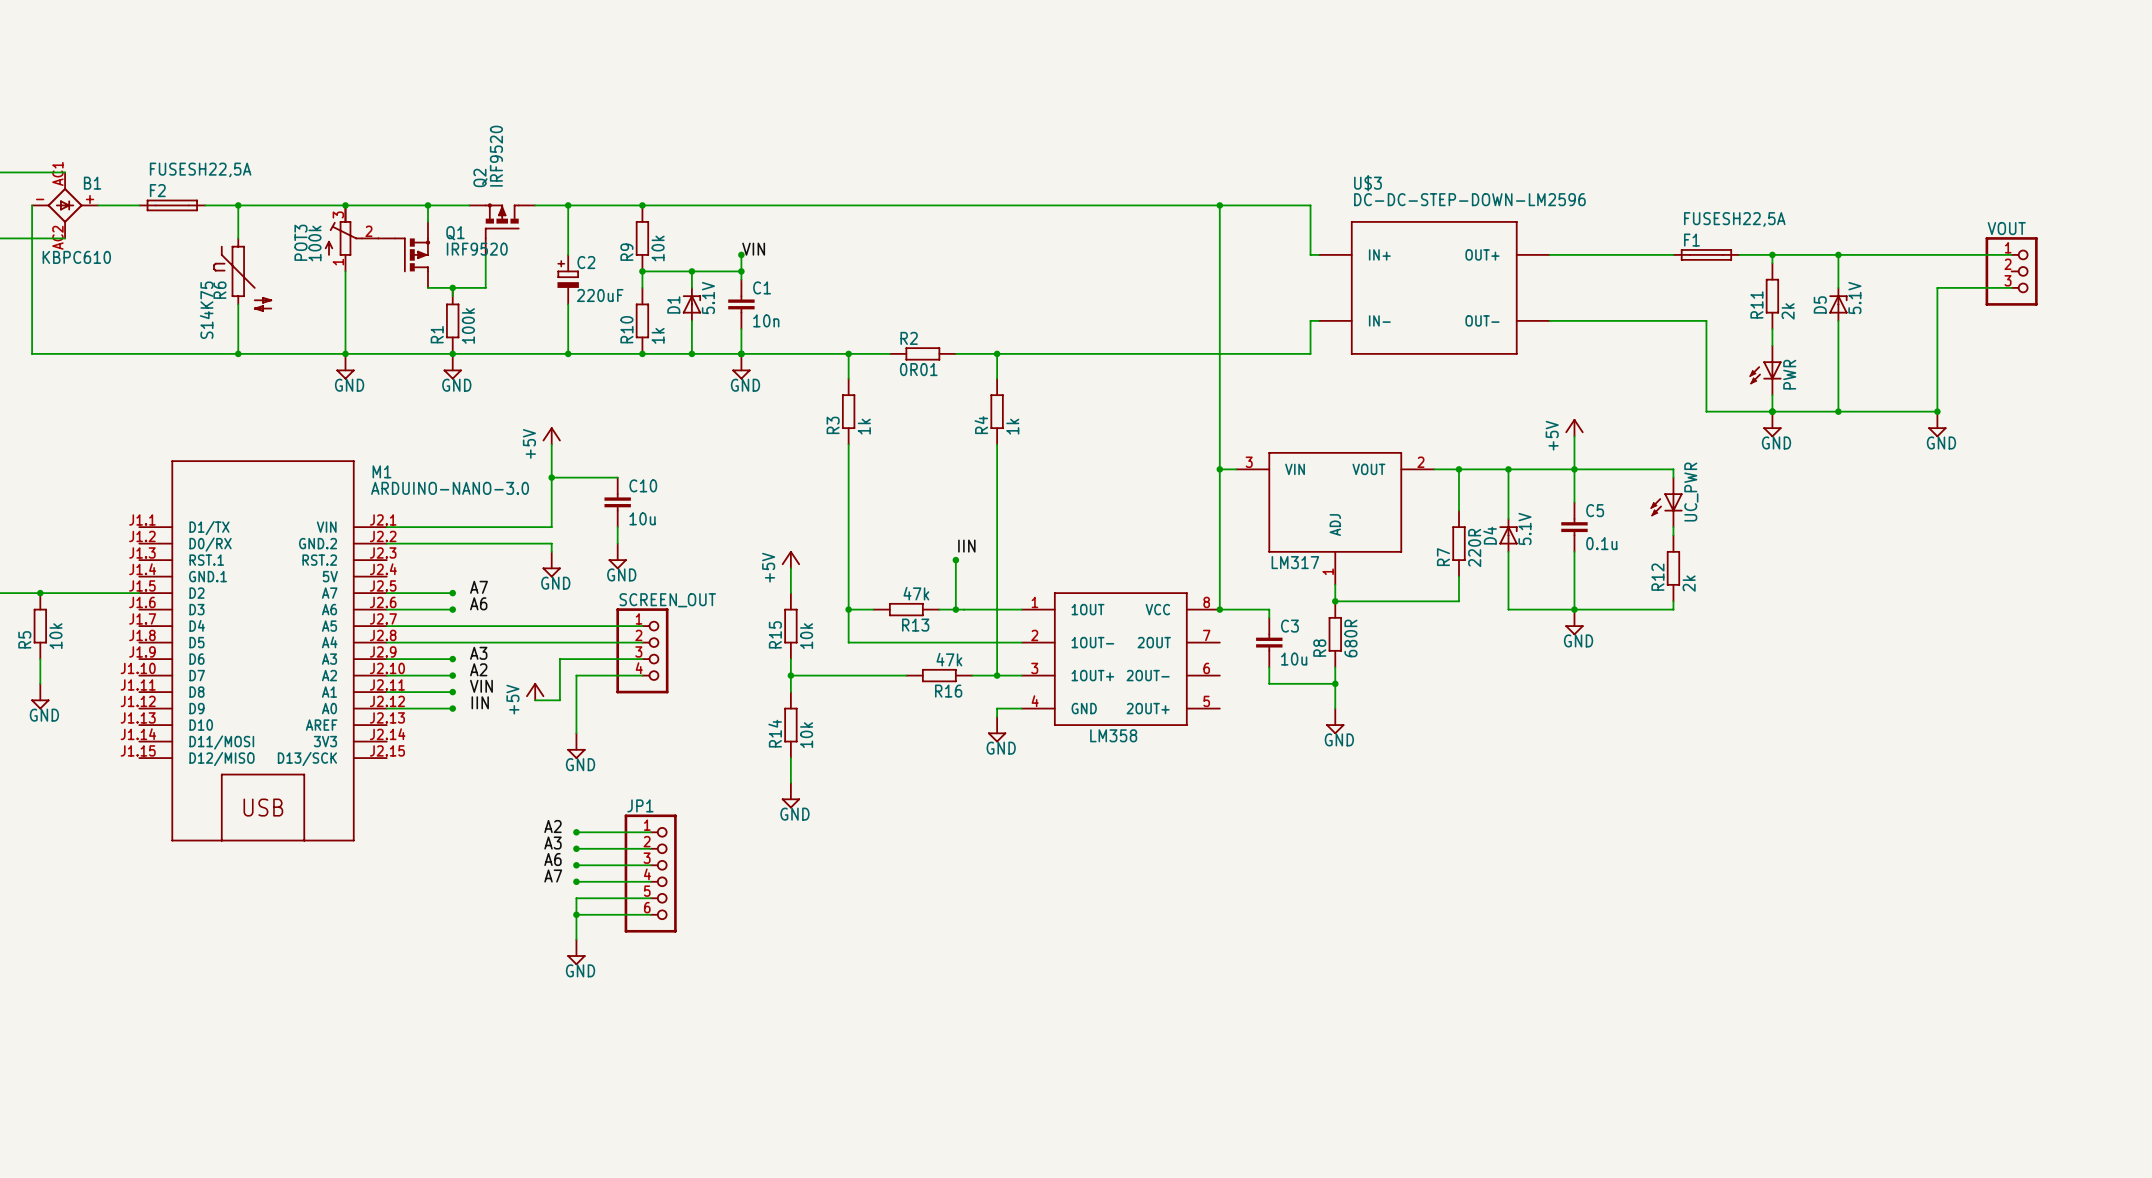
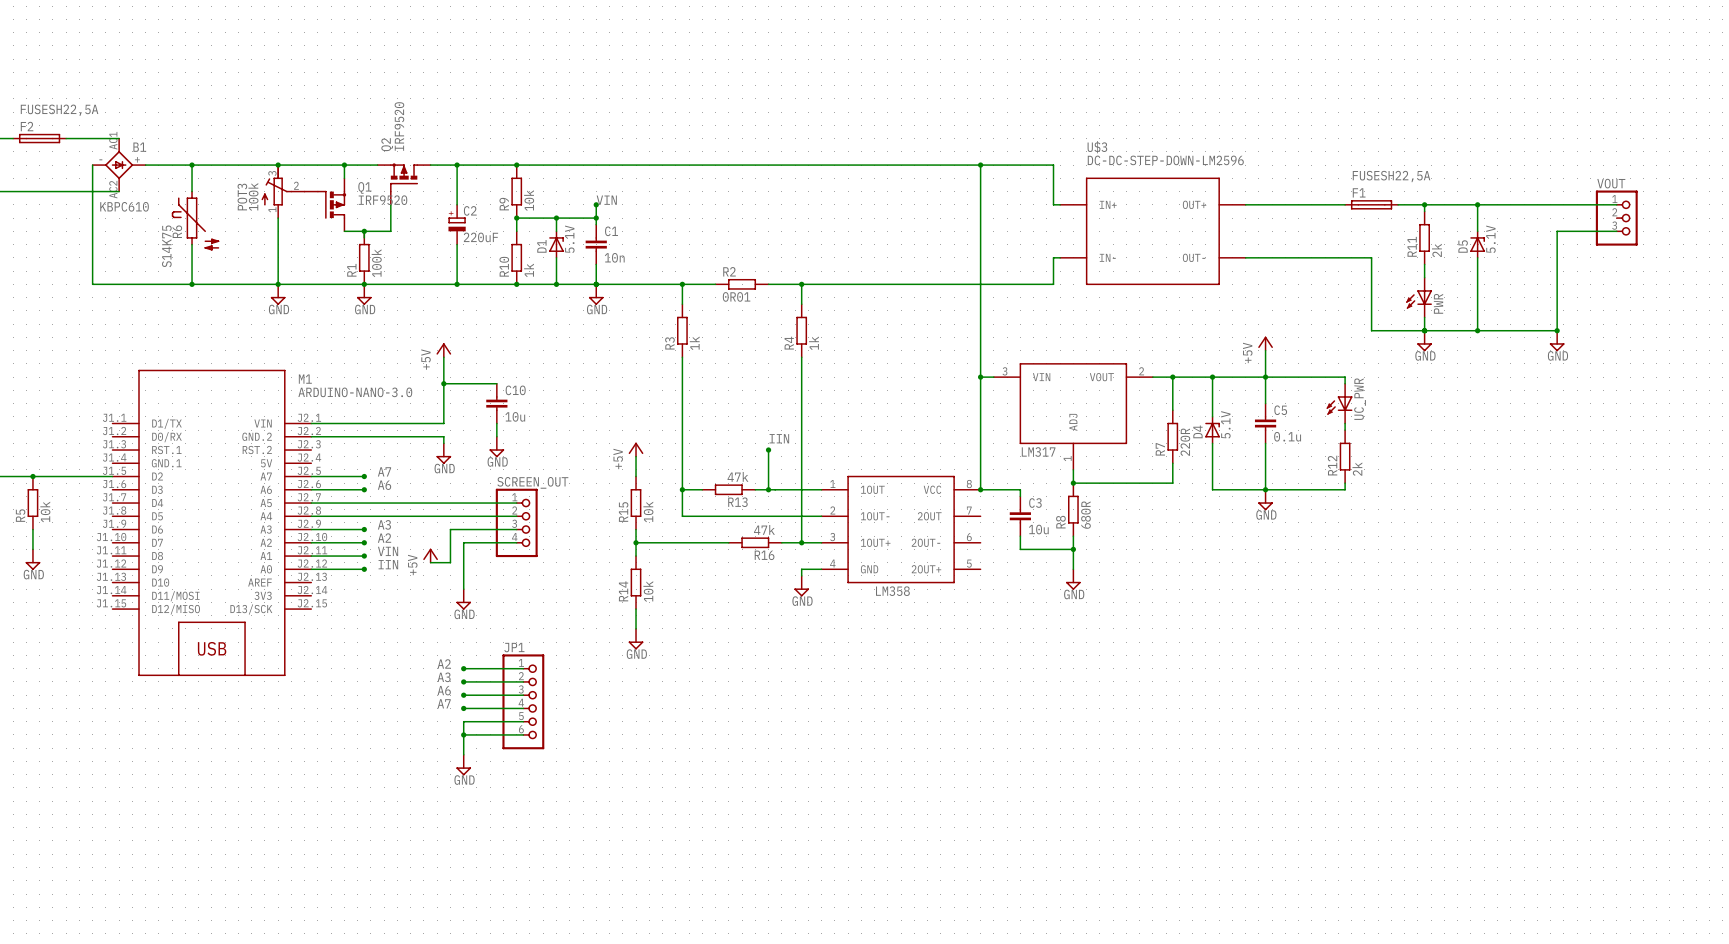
wire: none -> (66, 138) (119, 138)
wire: (32, 205) (32, 353) (114, 353) -> (92, 165) (92, 284)
B1 position: (65, 205) -> (119, 165)
wire: (98, 205) (139, 205) -> none
F2 position: (172, 205) -> (39, 138)
wire: none -> (52, 191) (119, 191)

